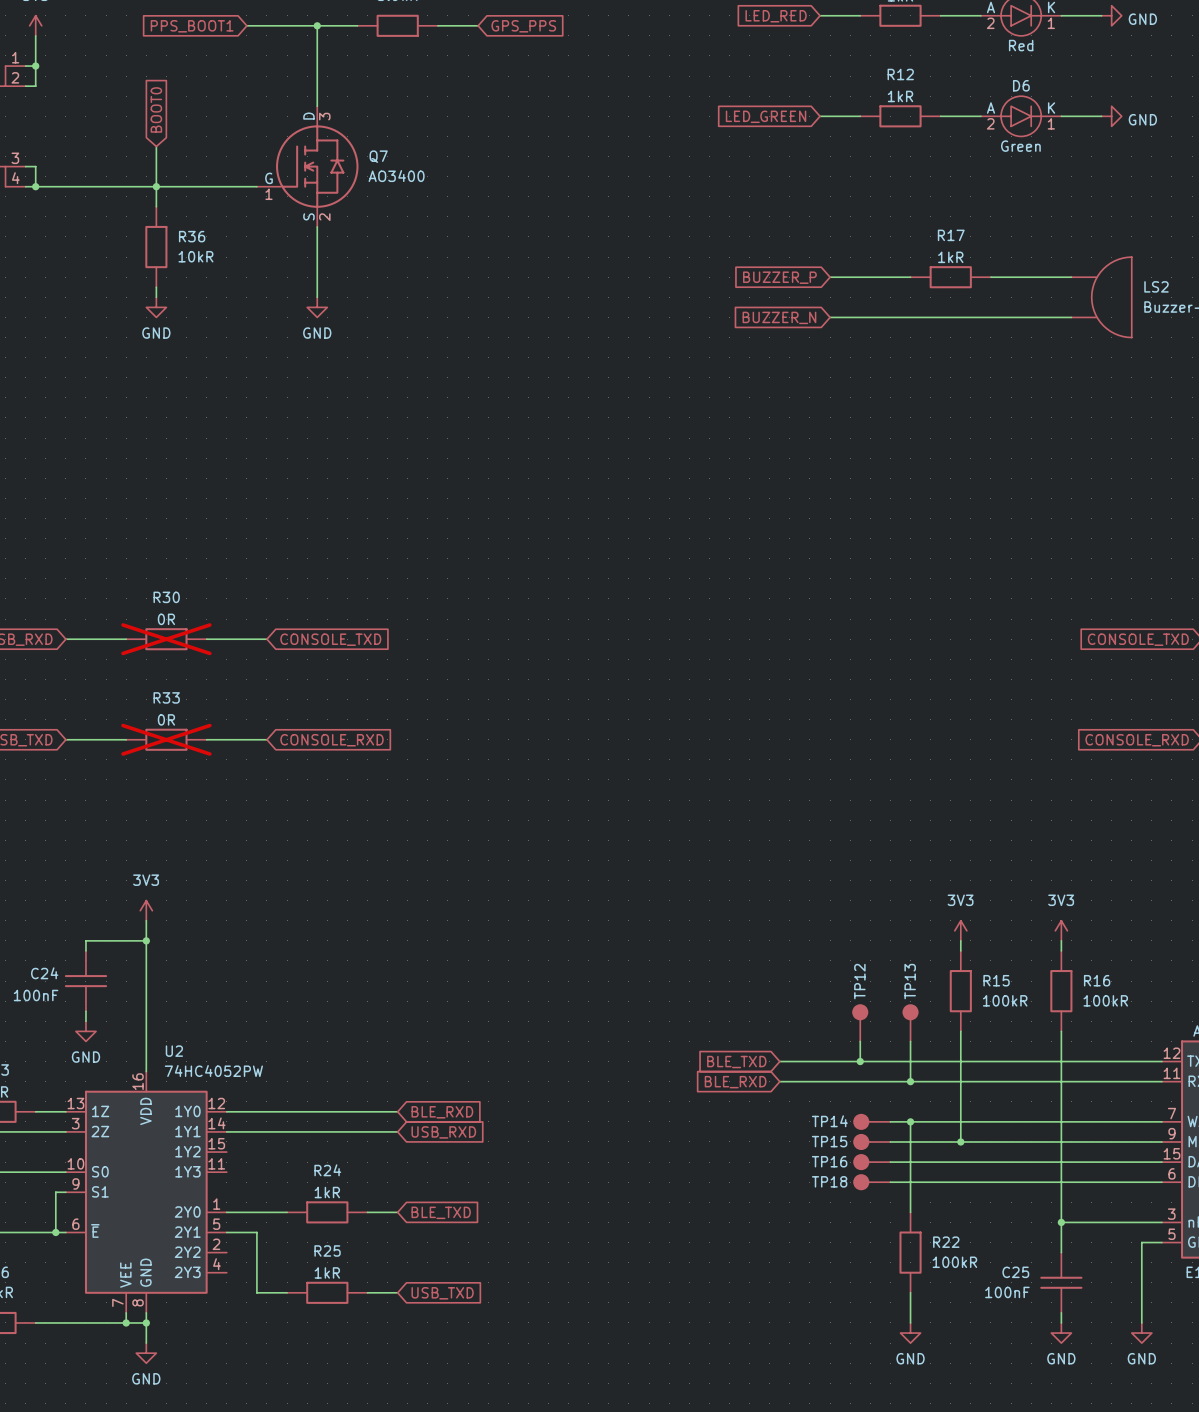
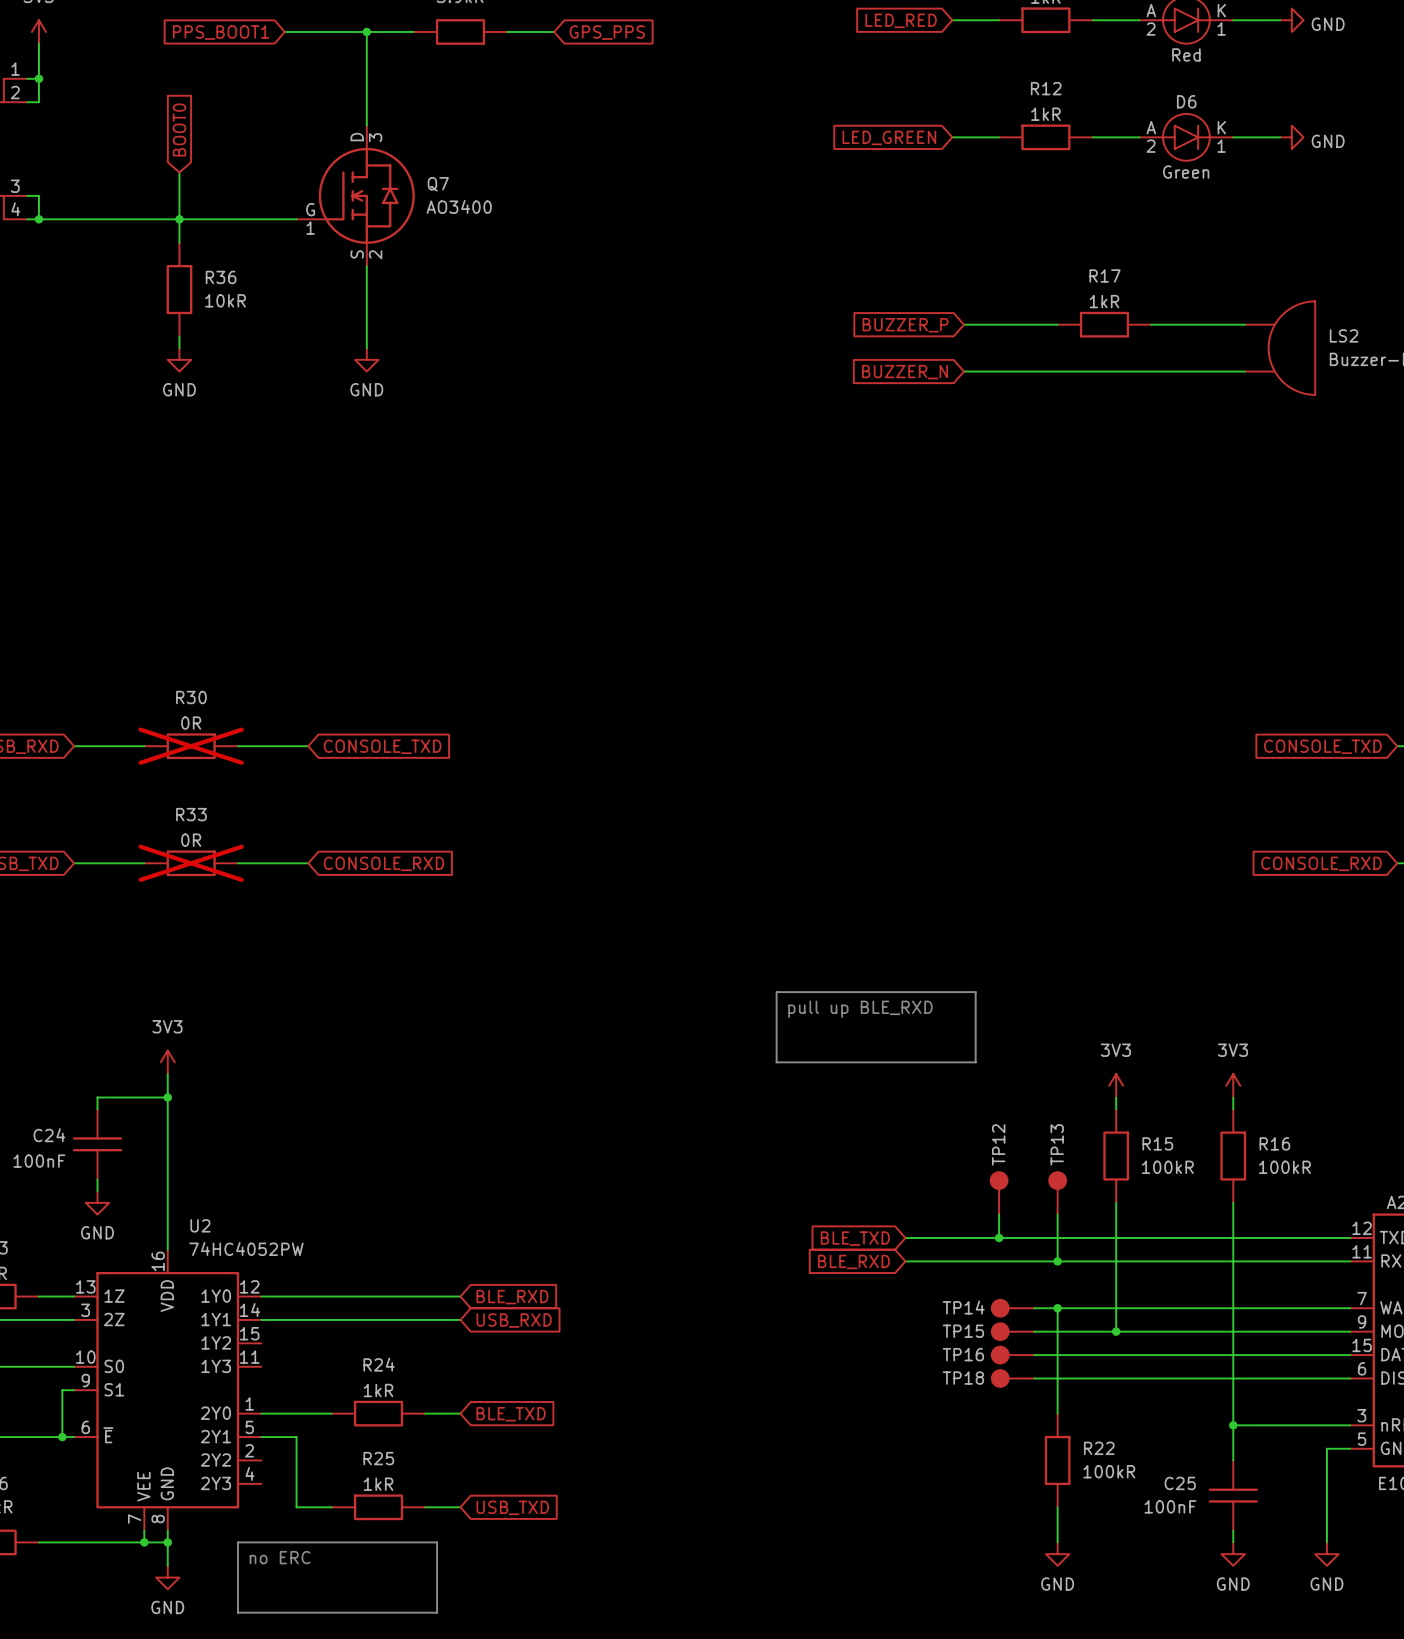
line: none -> (776, 992) (975, 992) (975, 1062) (776, 1062) (776, 992)
text: none -> pull up BLE_RXD (860, 1009)
line: none -> (238, 1542) (437, 1542) (437, 1612) (238, 1612) (238, 1542)
text: none -> no ERC (280, 1557)

